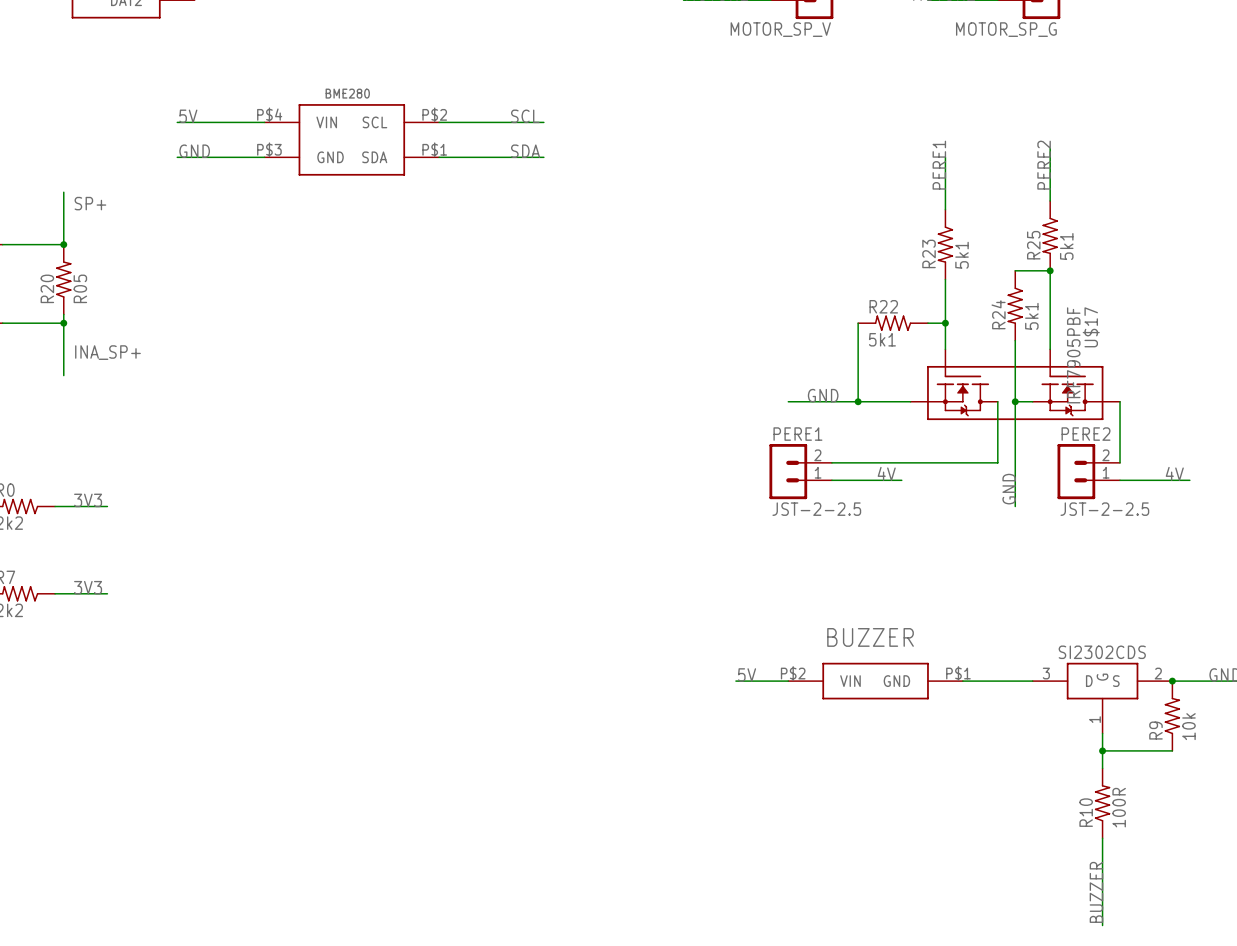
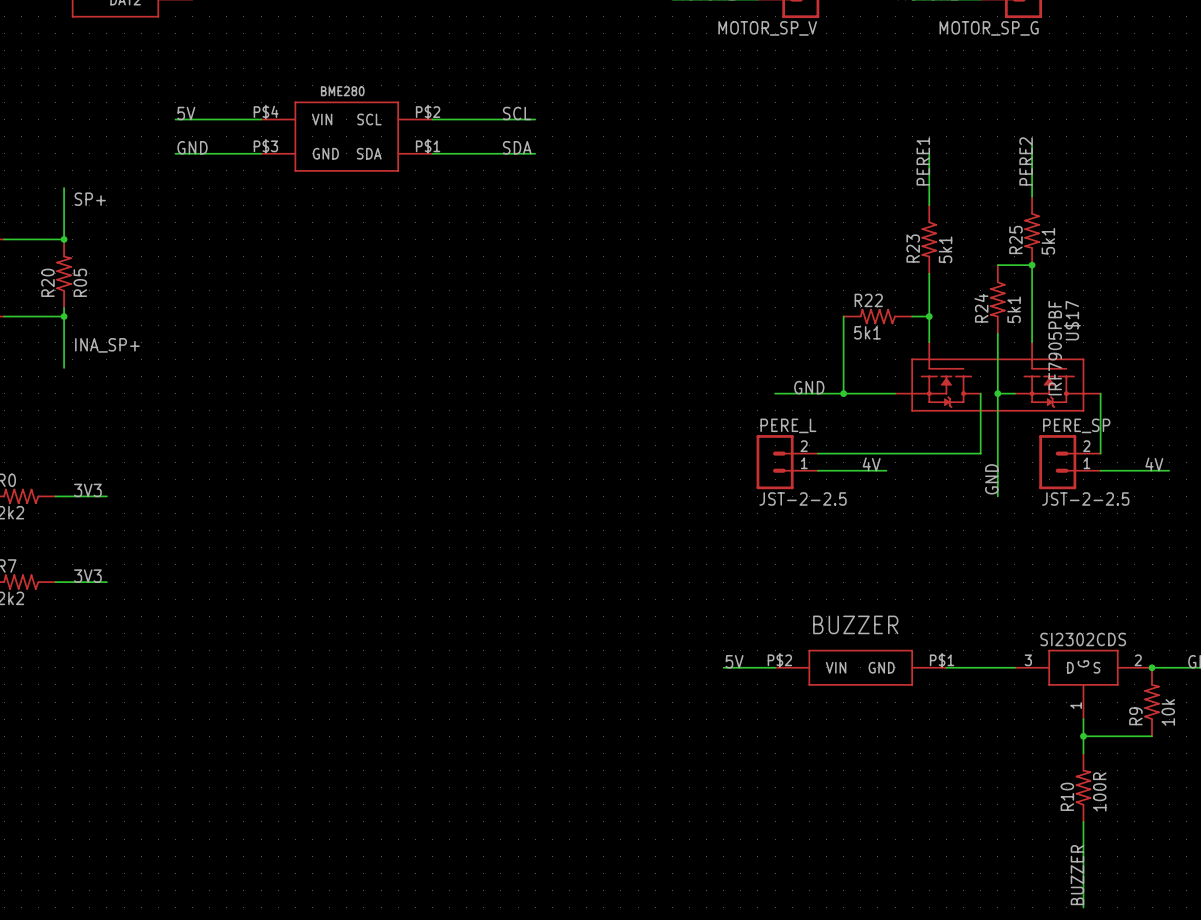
PERE1 name: PERE1 (797, 434) -> PERE_L (788, 425)
PERE2 name: PERE2 (1086, 434) -> PERE_SP (1076, 425)

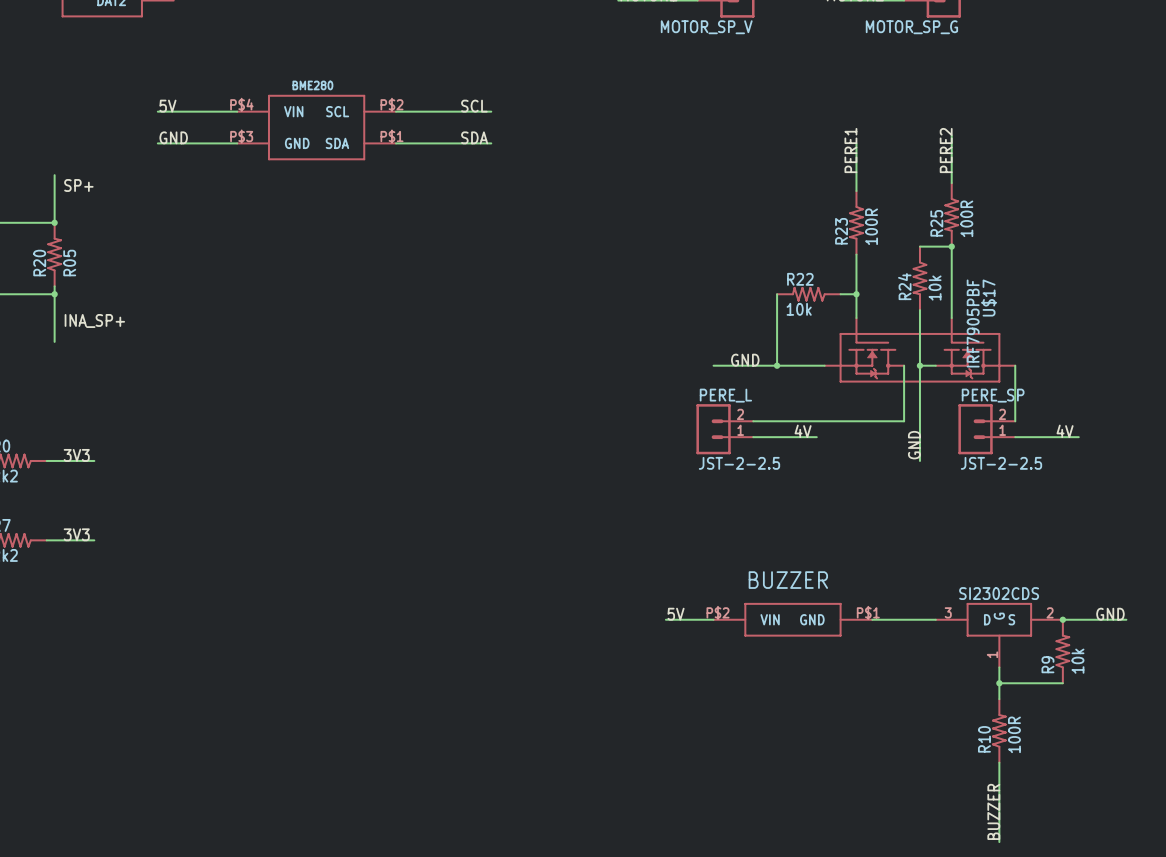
R25 value: 5k1 (1048, 241) -> 100R (966, 218)
R23 value: 5k1 (945, 249) -> 100R (871, 226)
R24 value: 5k1 (1014, 309) -> 10k (935, 288)
R22 value: 5k1 (867, 332) -> 10k (799, 309)

